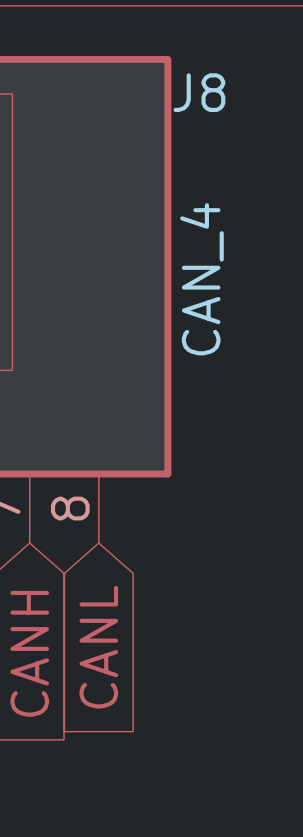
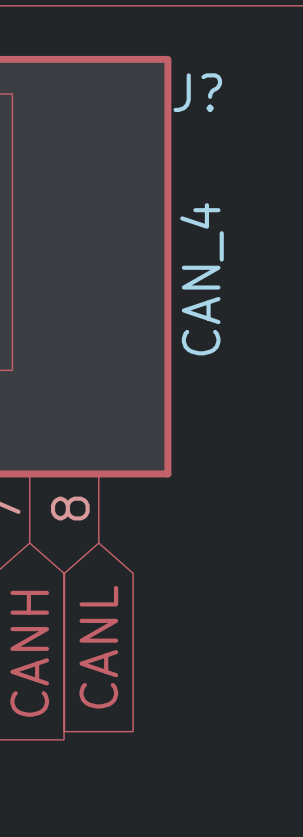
J8 name: J8 (199, 92) -> J? (197, 92)

